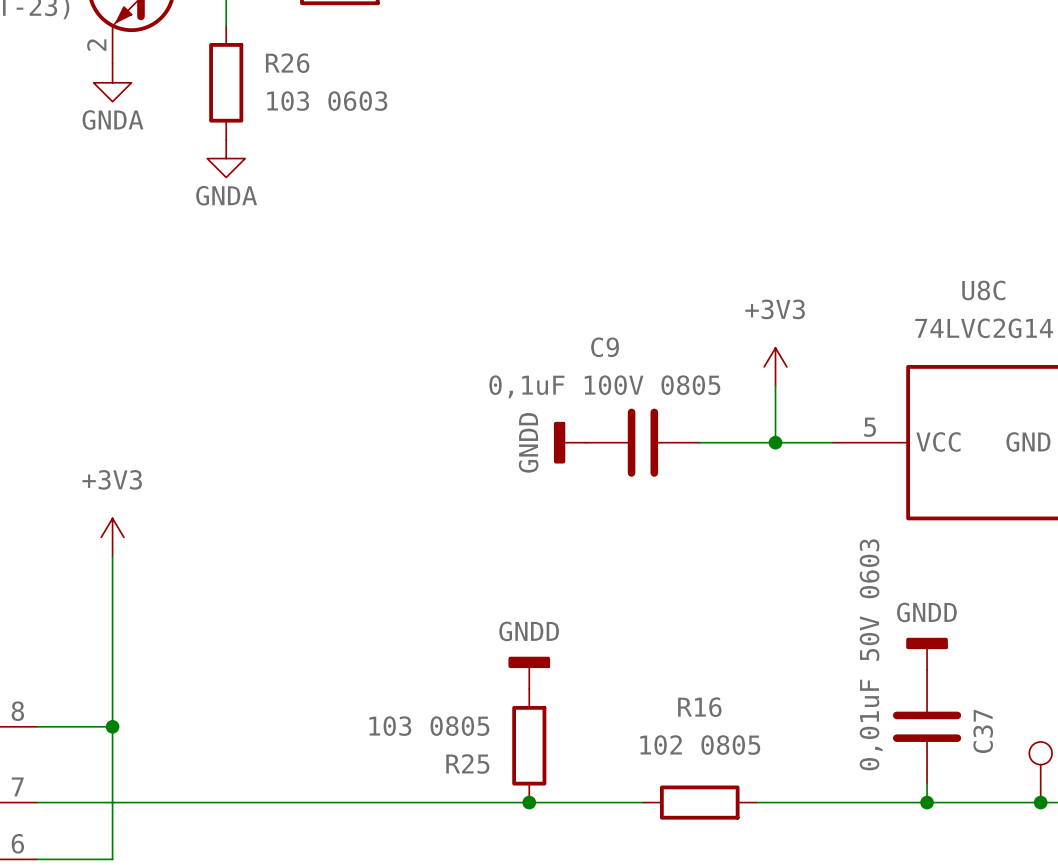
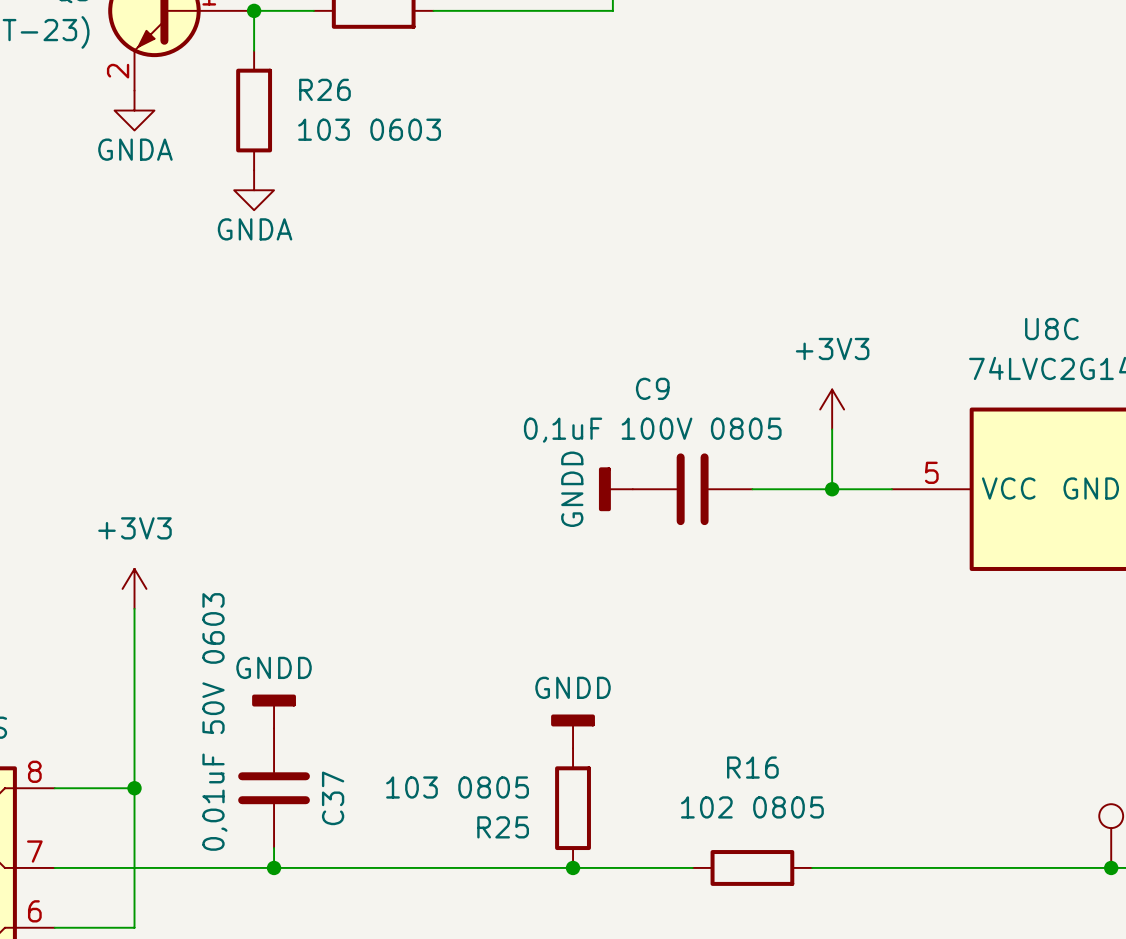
power symbol: none -> GNDD (274, 711)
power symbol: GNDD (927, 653) -> none
C37 position: (927, 726) -> (274, 788)
wire: none -> (274, 848) (274, 867)
wire: (927, 783) (927, 802) -> none
junction: none -> (274, 867)
junction: (927, 802) -> none

